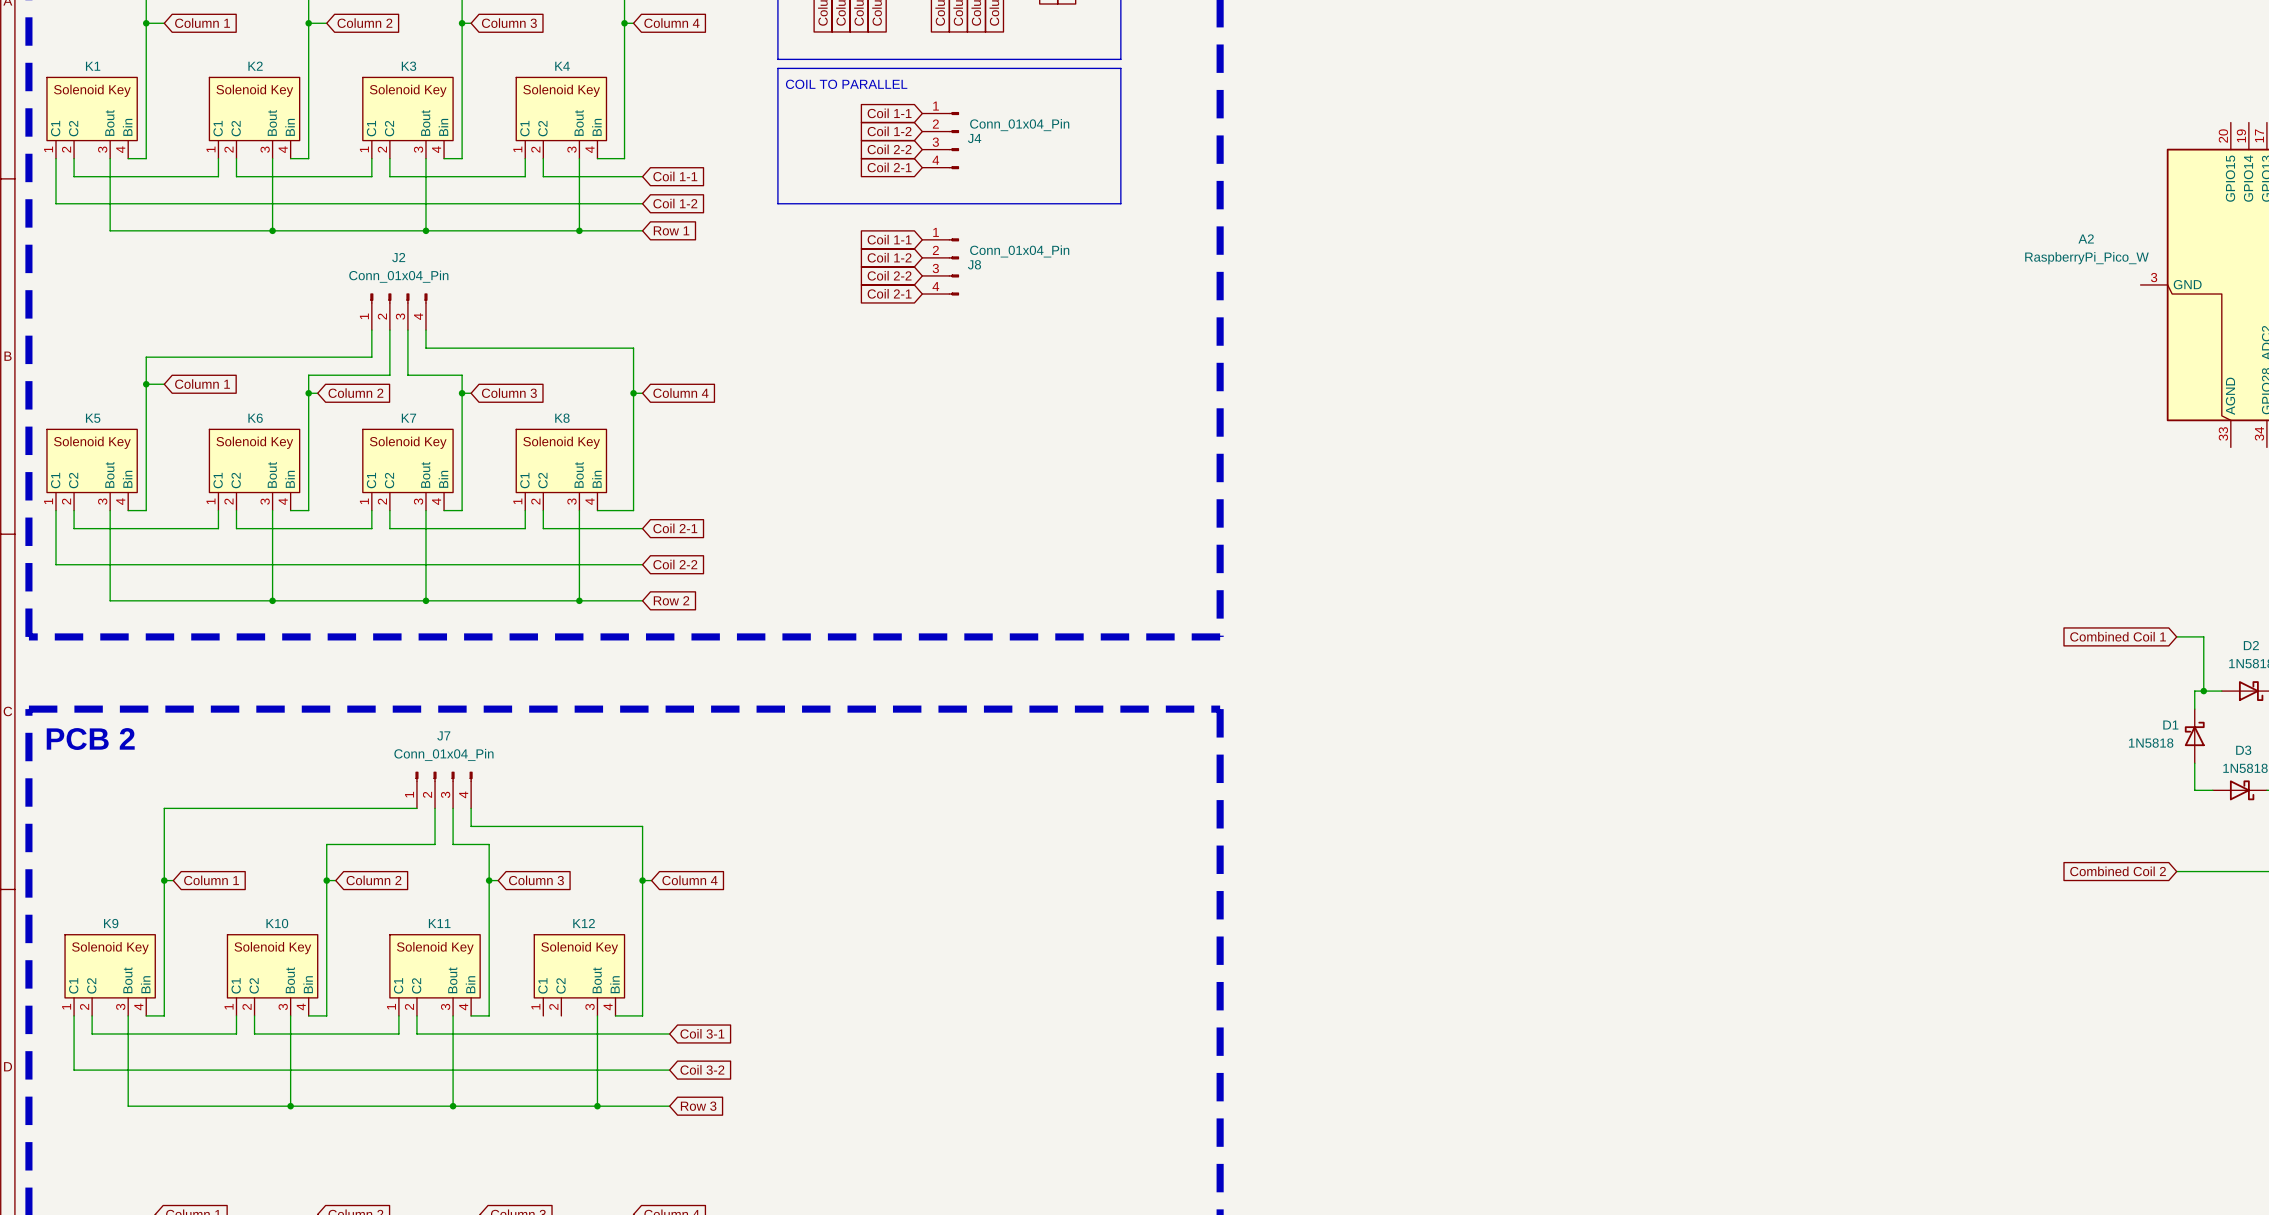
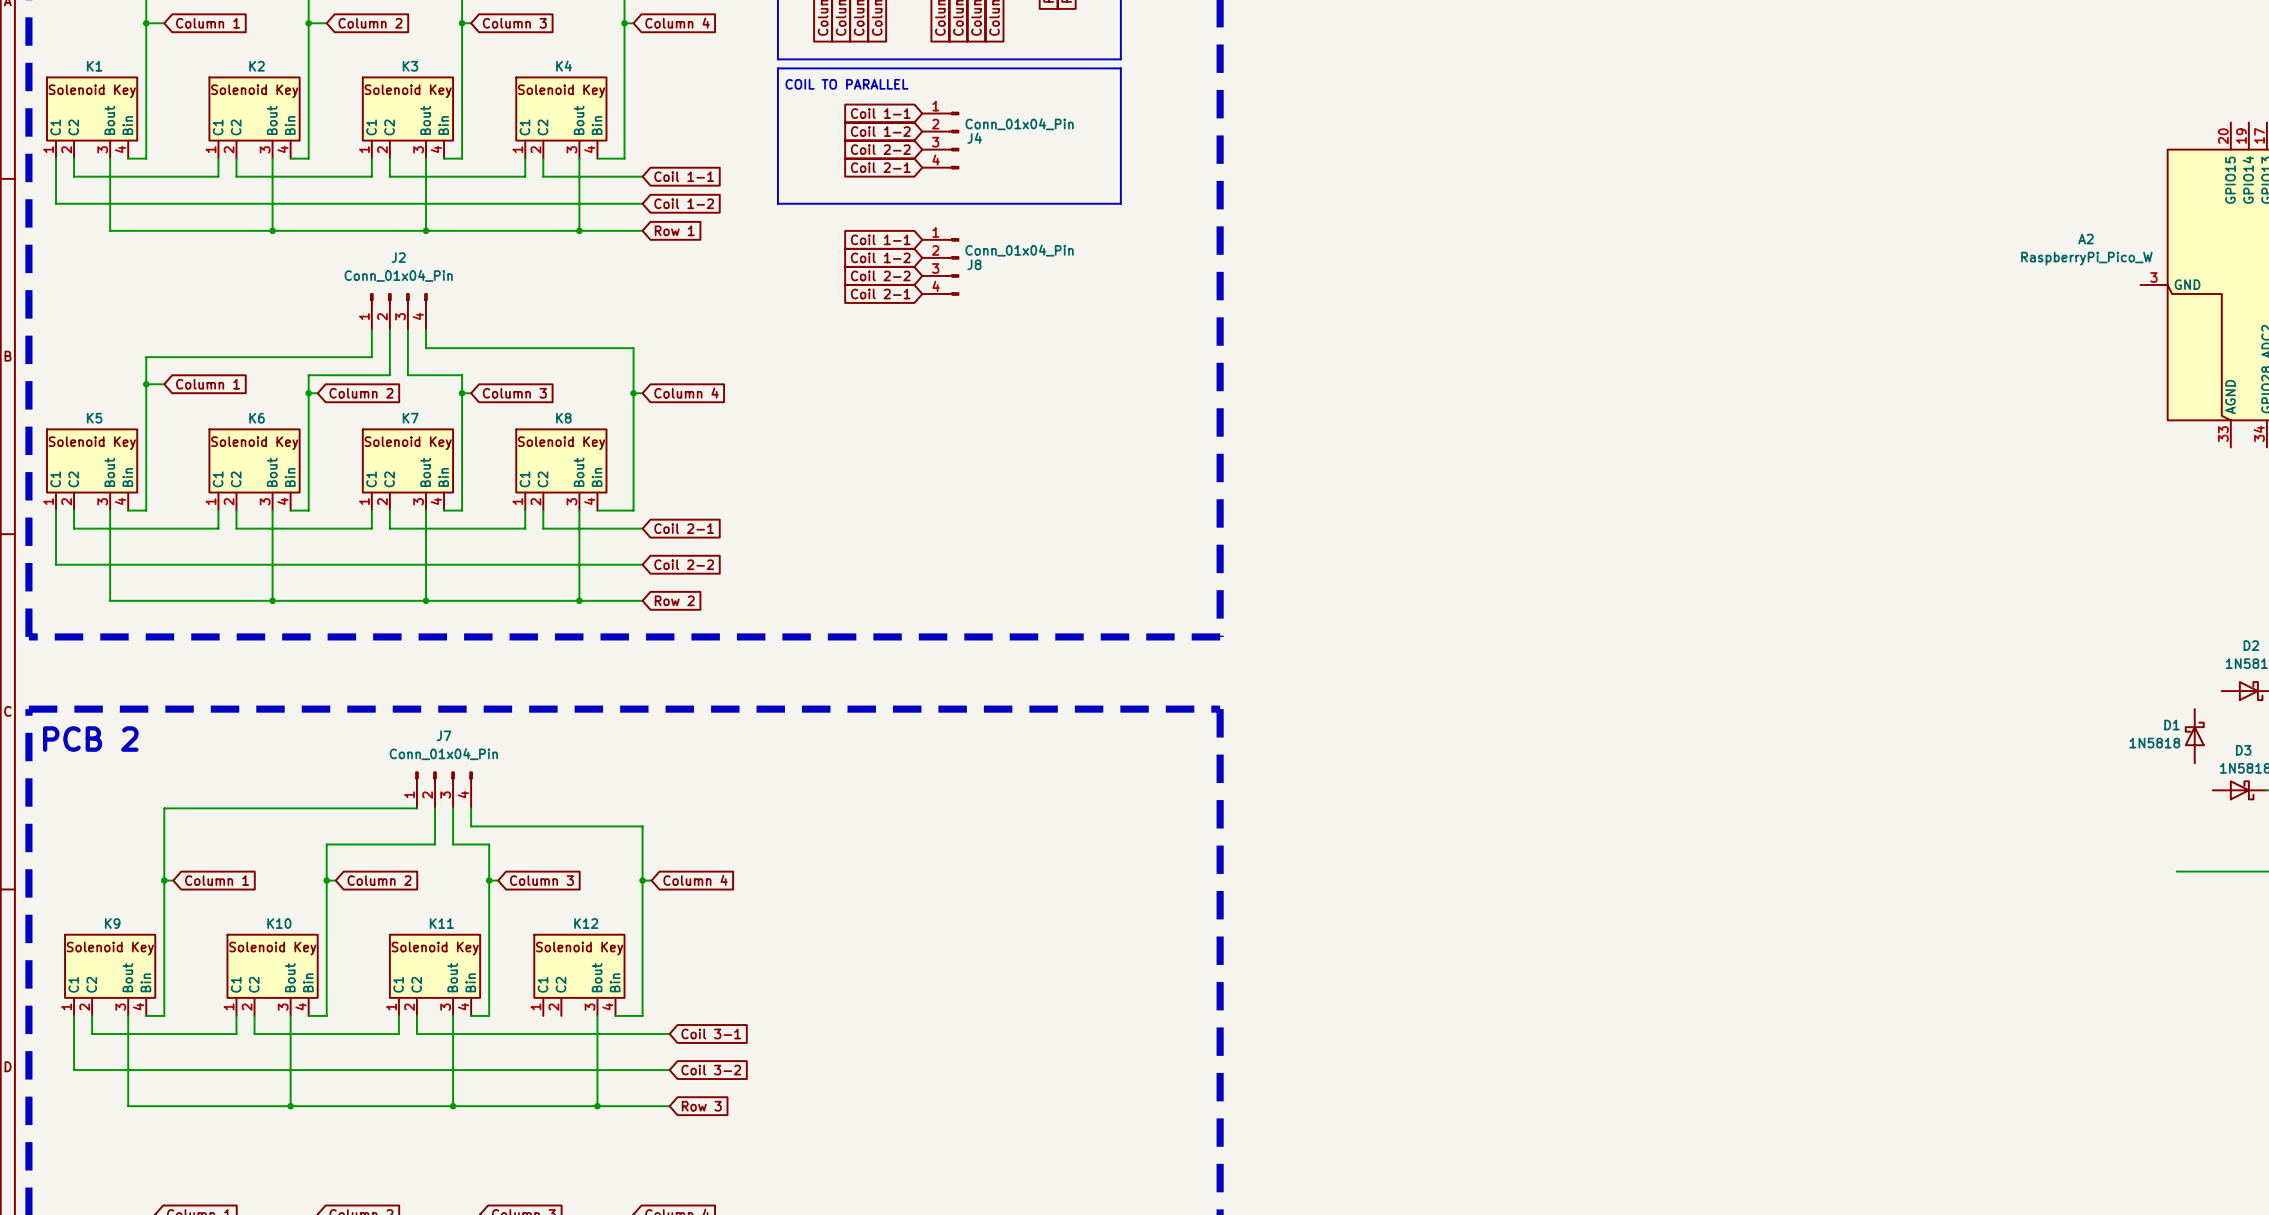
global label: Combined Coil 1 (2118, 636) -> none
wire: (2176, 636) (2203, 636) (2203, 691) -> none
junction: (2203, 691) -> none
wire: (2221, 691) (2194, 691) (2194, 709) -> none
wire: (2194, 763) (2194, 790) (2212, 790) -> none
global label: Combined Coil 2 (2118, 871) -> none

